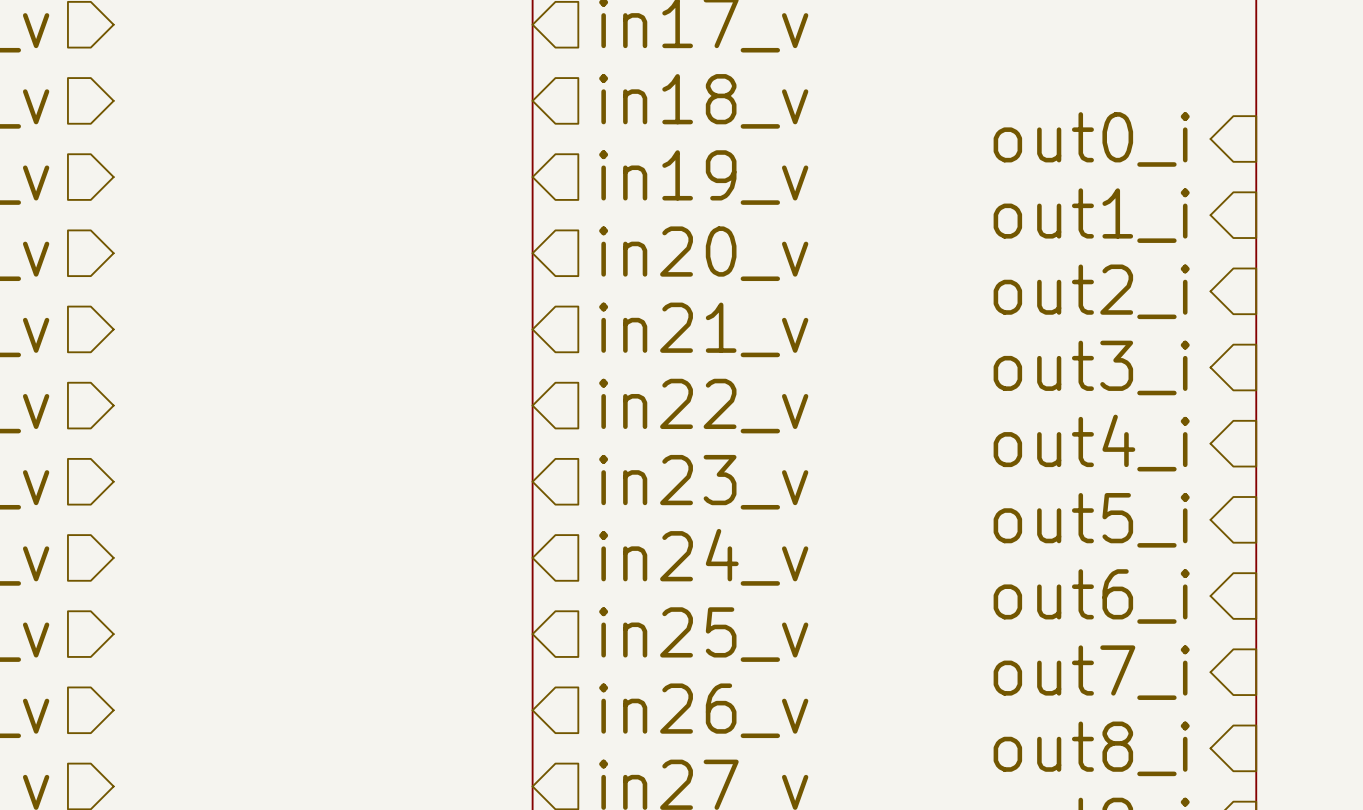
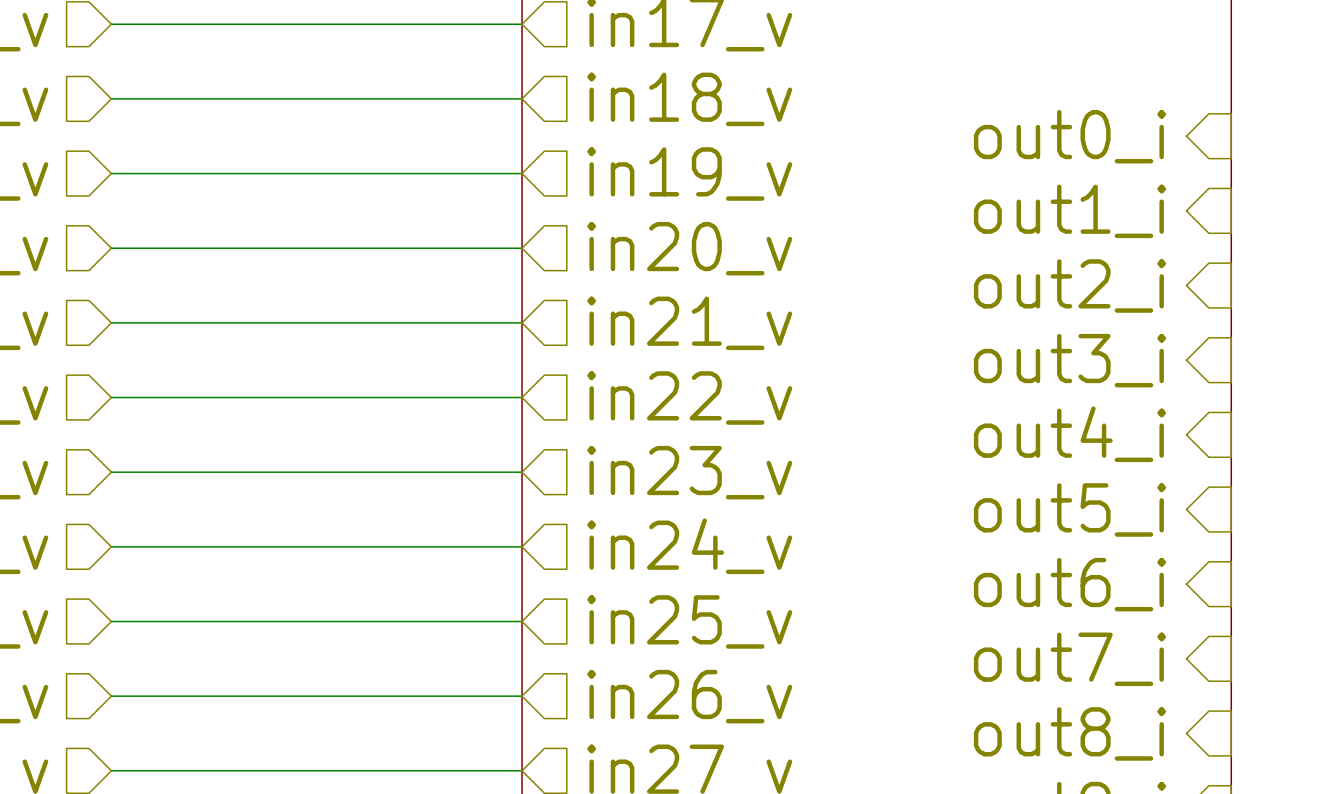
wire: none -> (111, 24) (522, 24)
wire: none -> (111, 98) (522, 98)
wire: none -> (111, 173) (522, 173)
wire: none -> (111, 248) (522, 248)
wire: none -> (111, 322) (522, 322)
wire: none -> (111, 397) (522, 397)
wire: none -> (111, 472) (522, 472)
wire: none -> (111, 546) (522, 546)
wire: none -> (111, 621) (522, 621)
wire: none -> (111, 696) (522, 696)
wire: none -> (111, 770) (522, 770)

